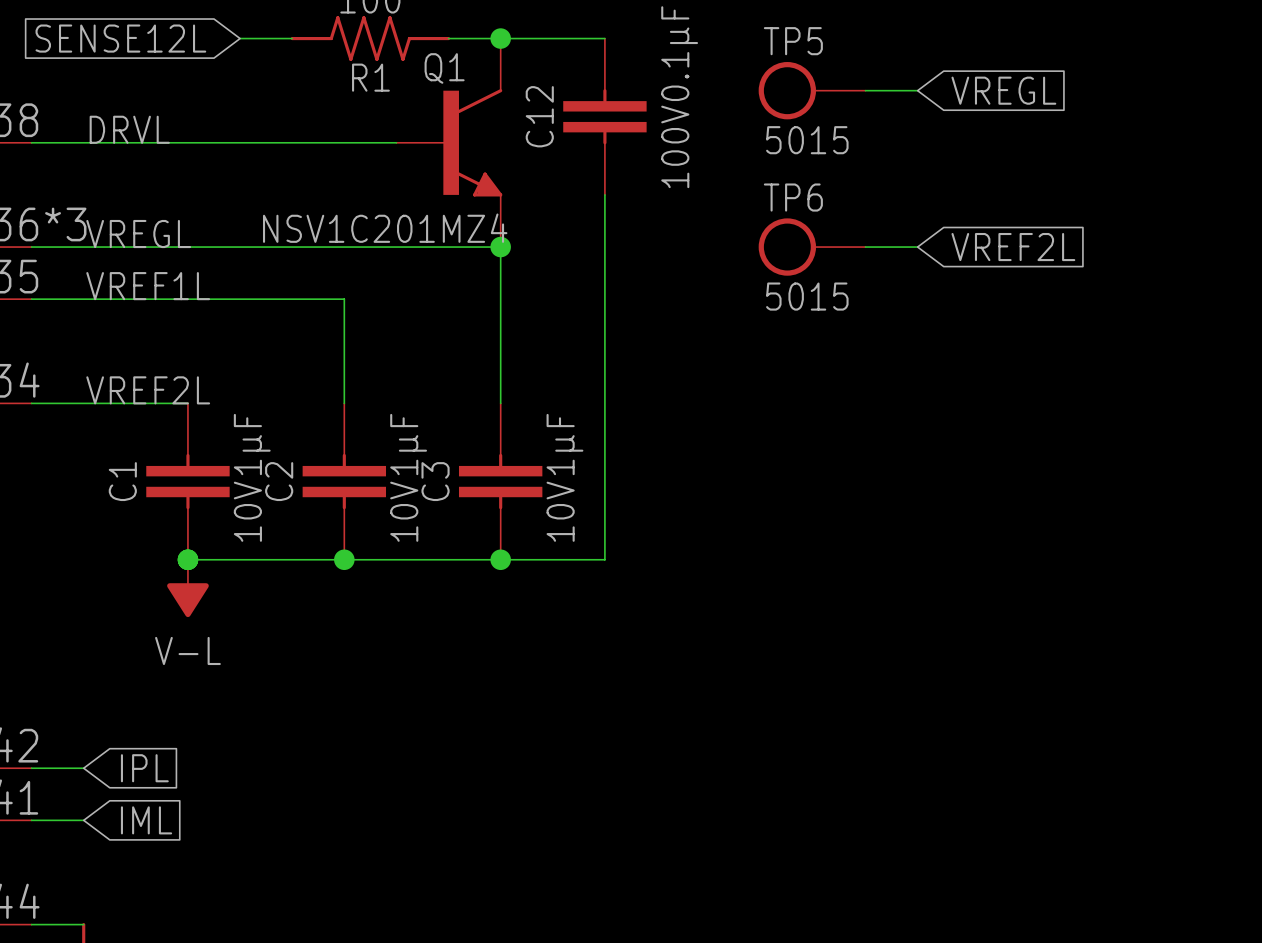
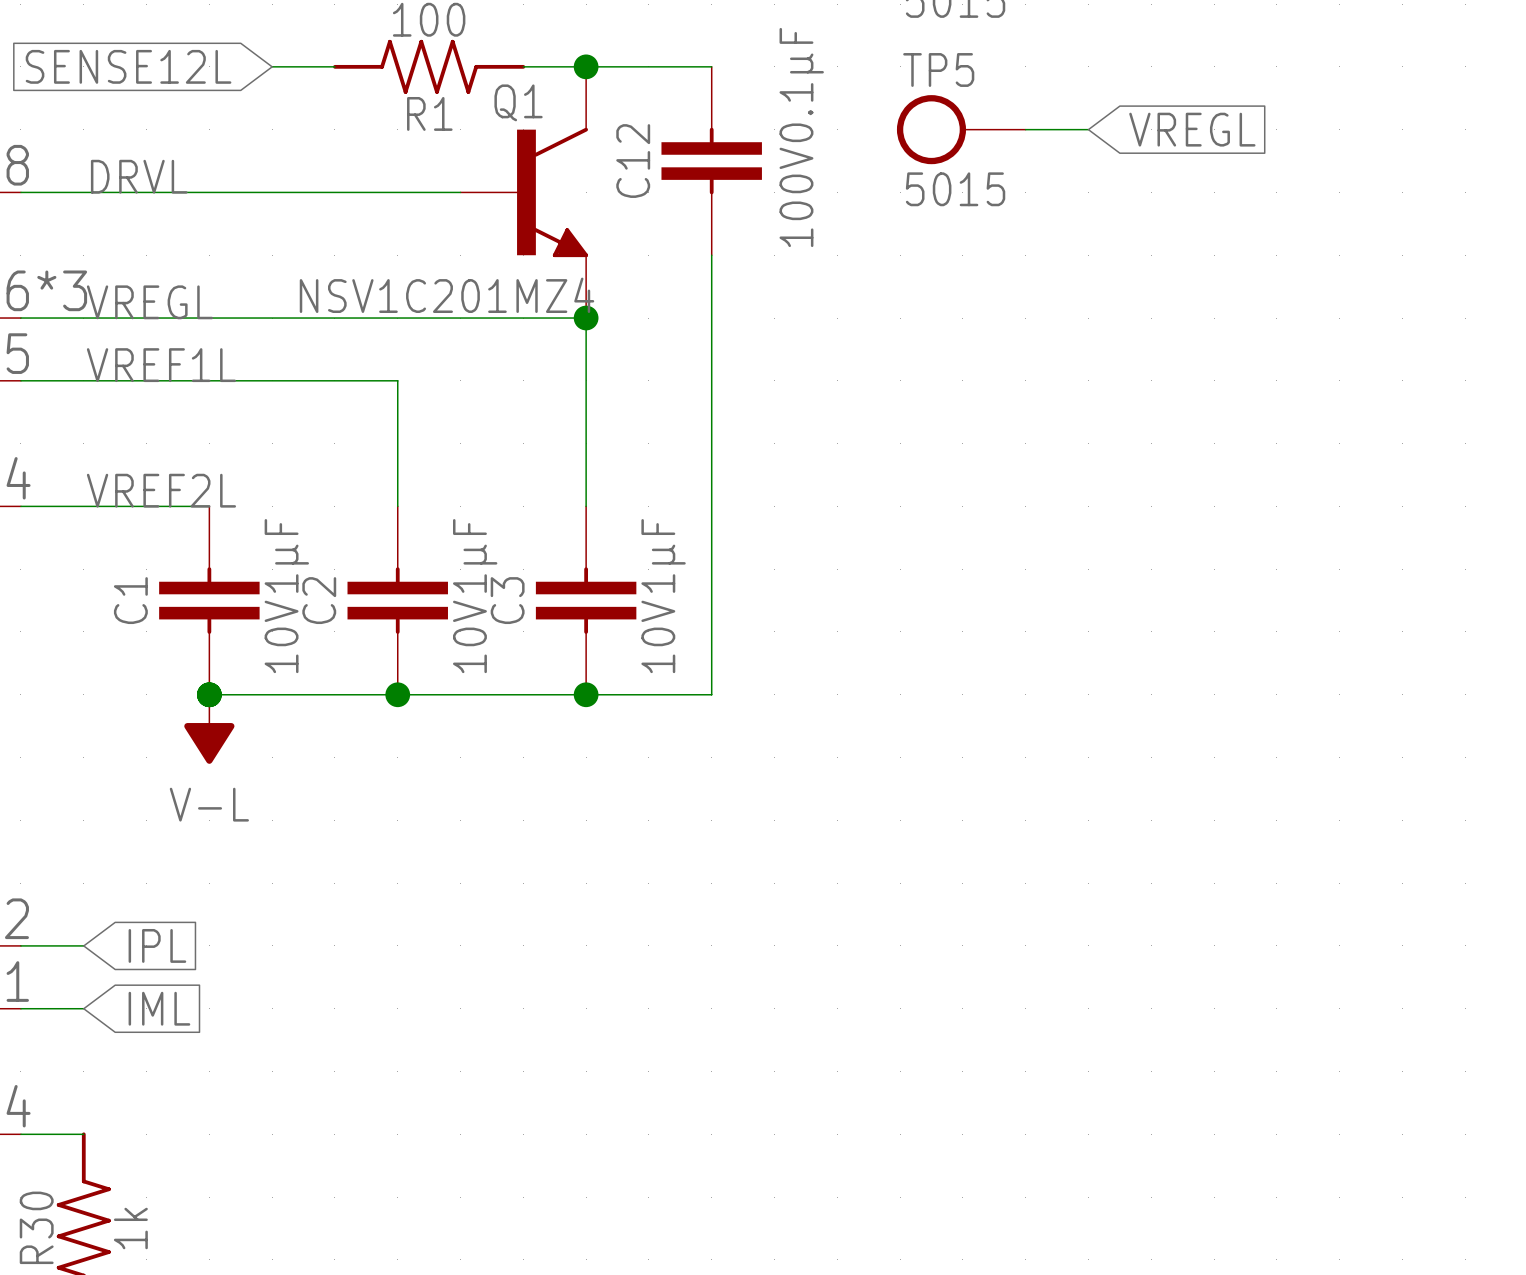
TP6: (812, 247) -> none
wire: (865, 247) (917, 247) -> none
global label: VREF2L (1013, 247) -> none

